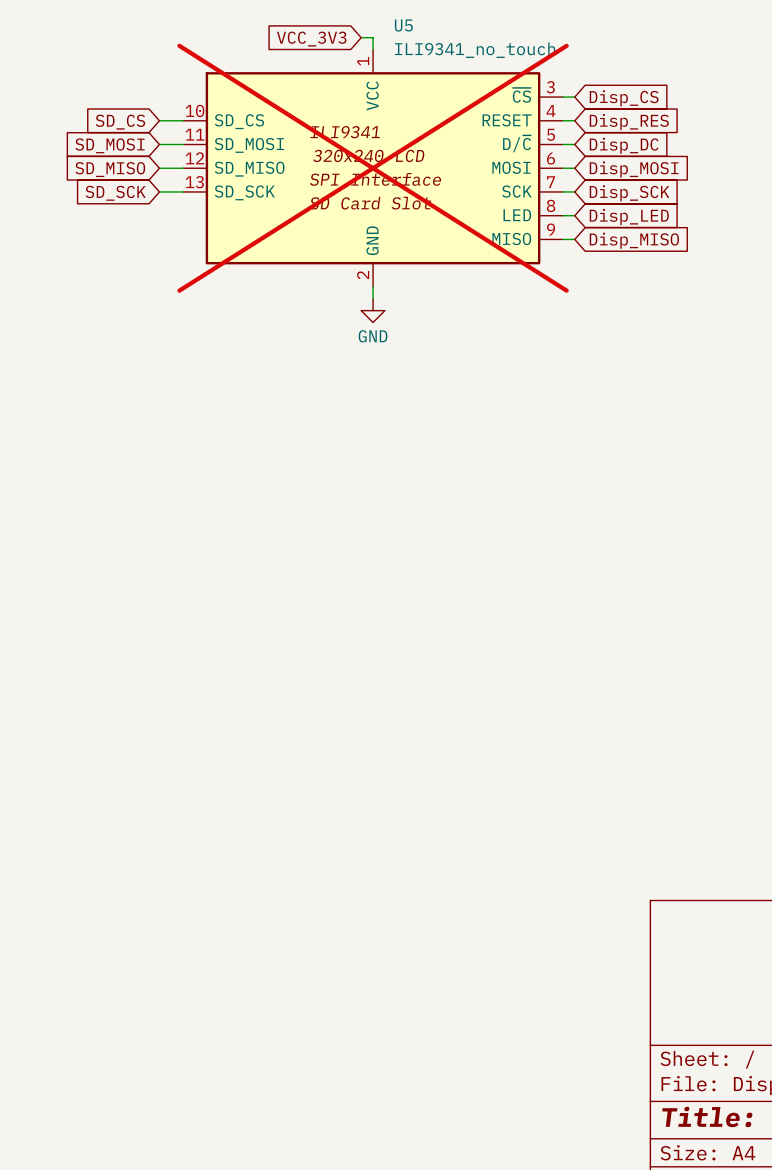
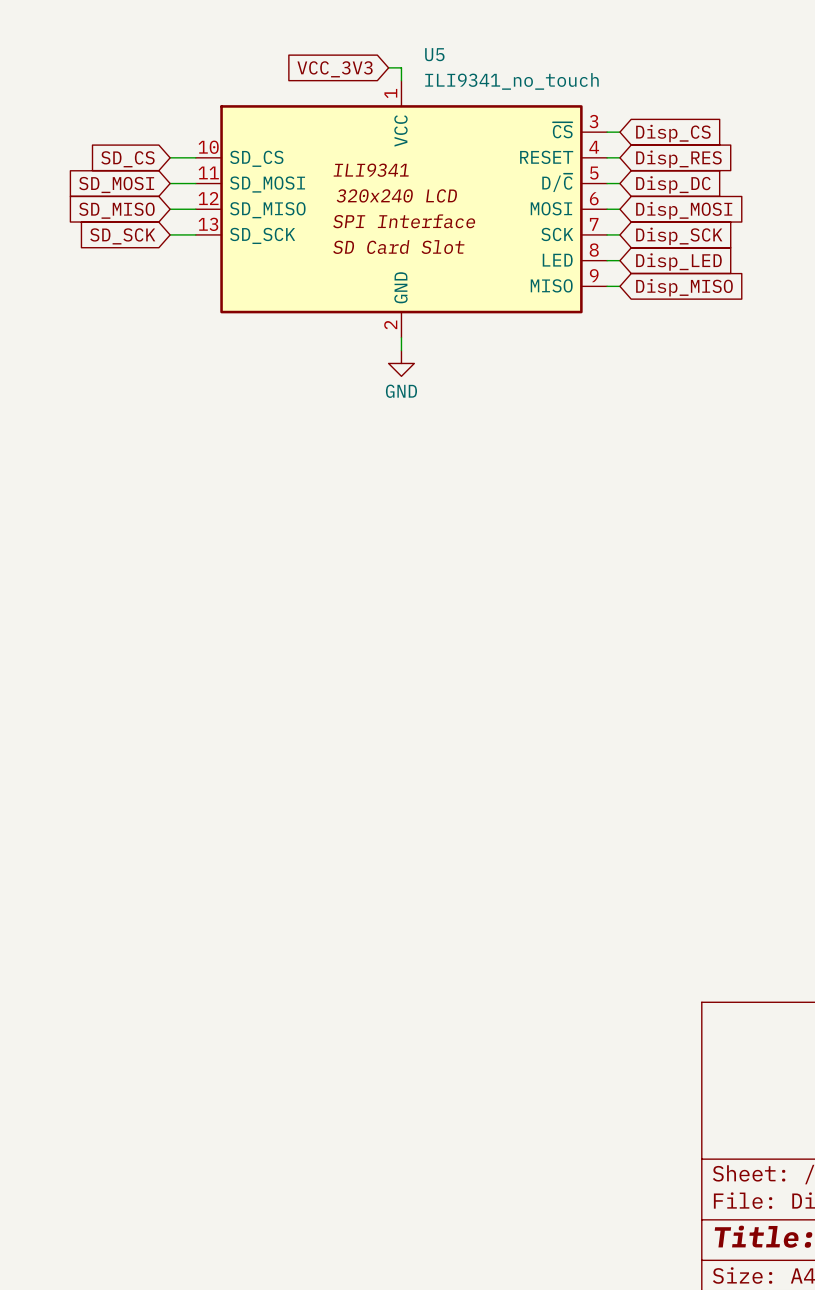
U5 do-not-place cross: (373, 168) -> none

